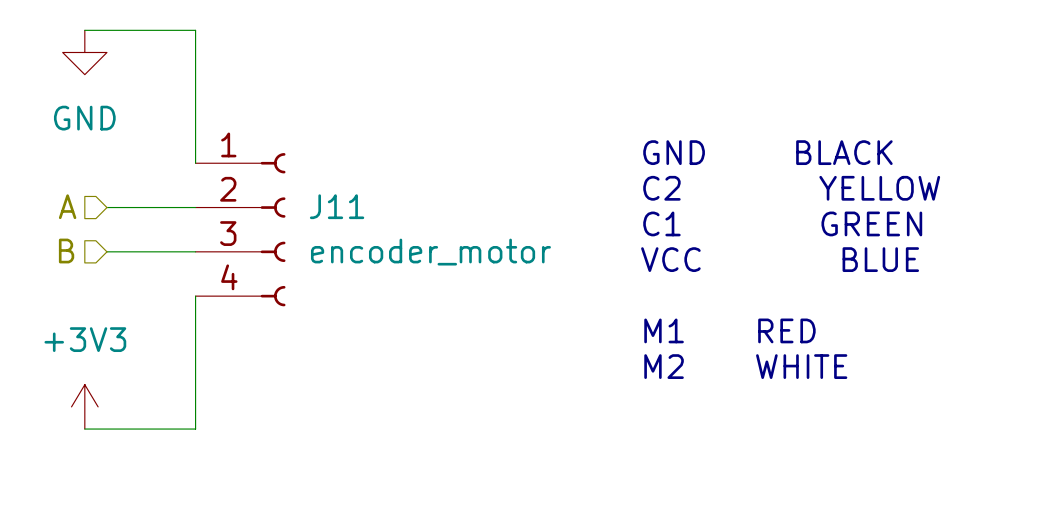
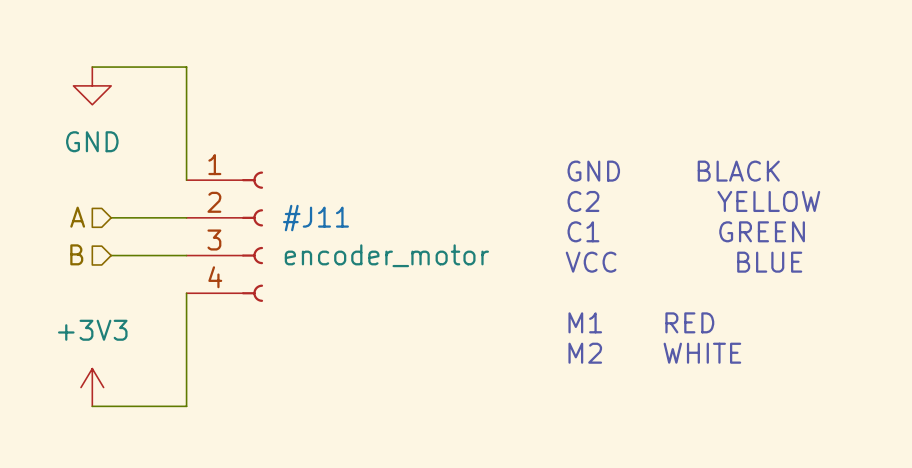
J11: encoder_motor (240, 229) -> none
#J11: none -> encoder_motor (224, 236)

